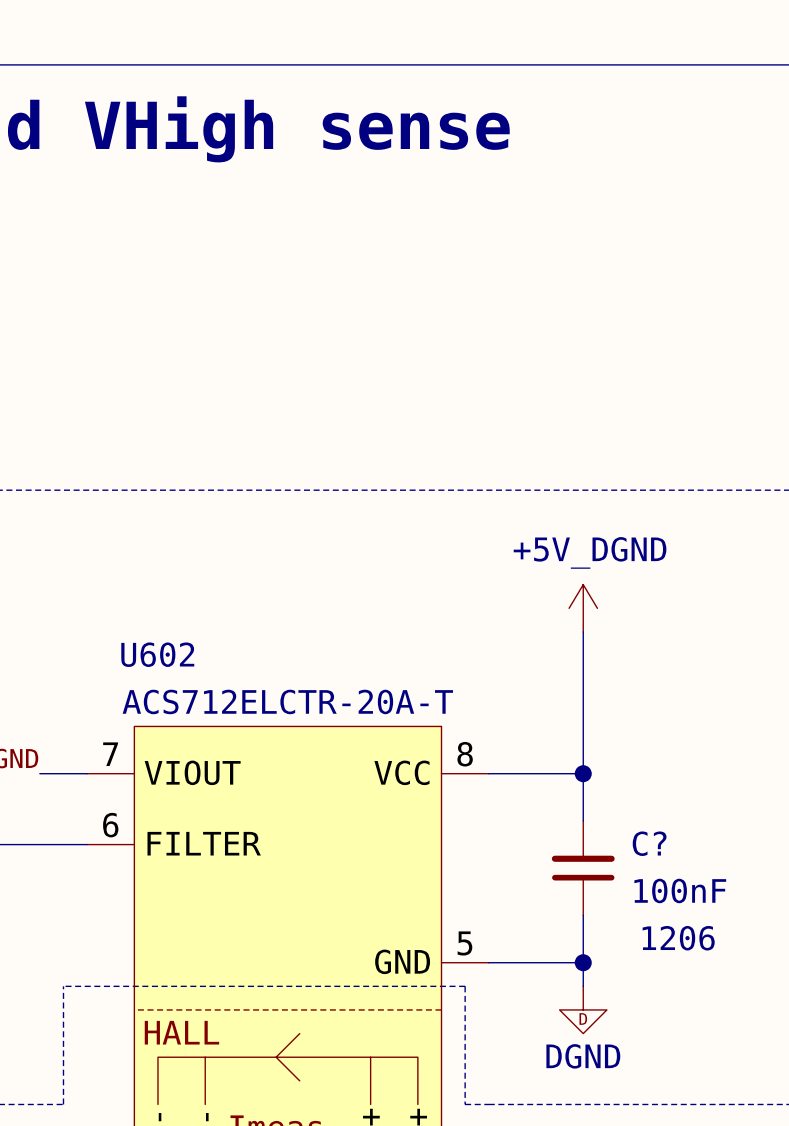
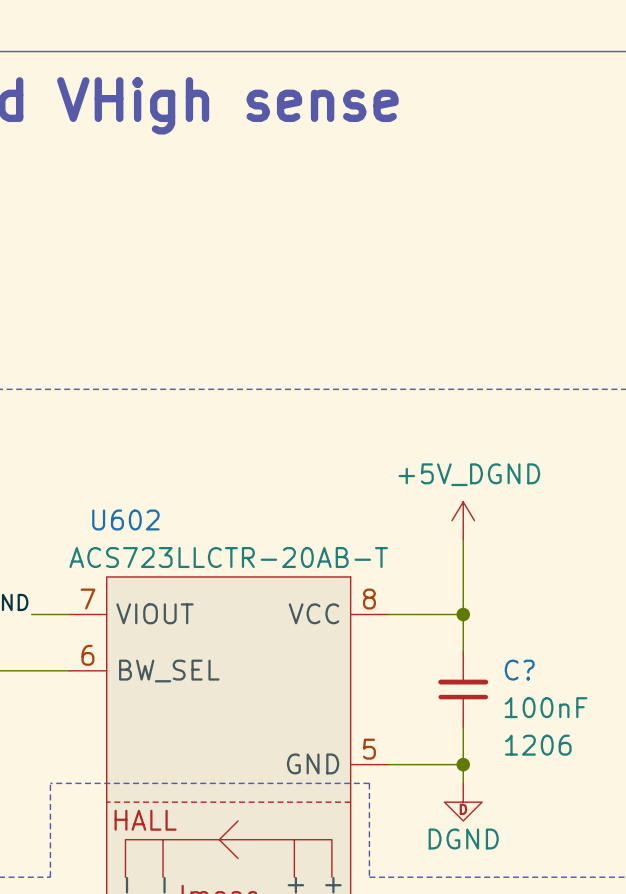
power symbol position: +5V_DGND (583, 608) -> +5V_DGND (463, 520)
U602 text: ACS712ELCTR-20A-T (287, 701) -> ACS723LLCTR-20AB-T (228, 557)
U602 pin name: FILTER (204, 843) -> BW_SEL (169, 671)

